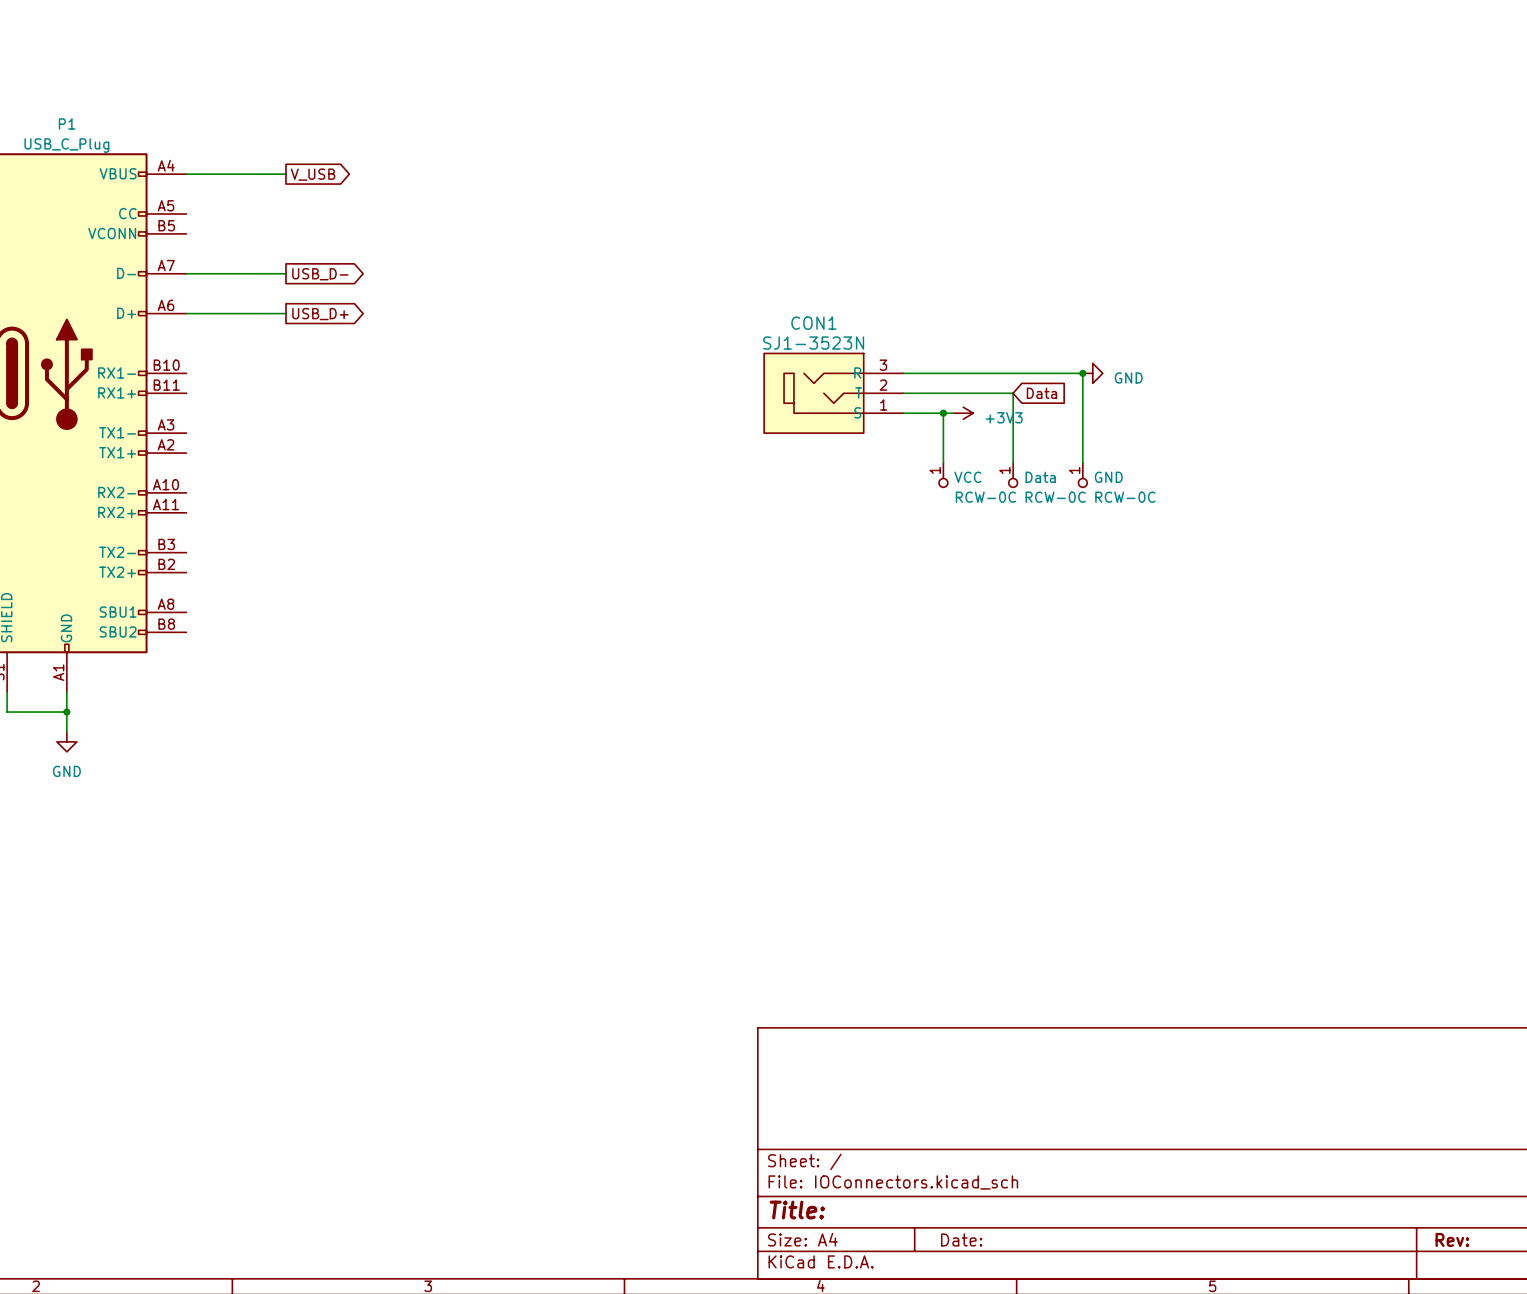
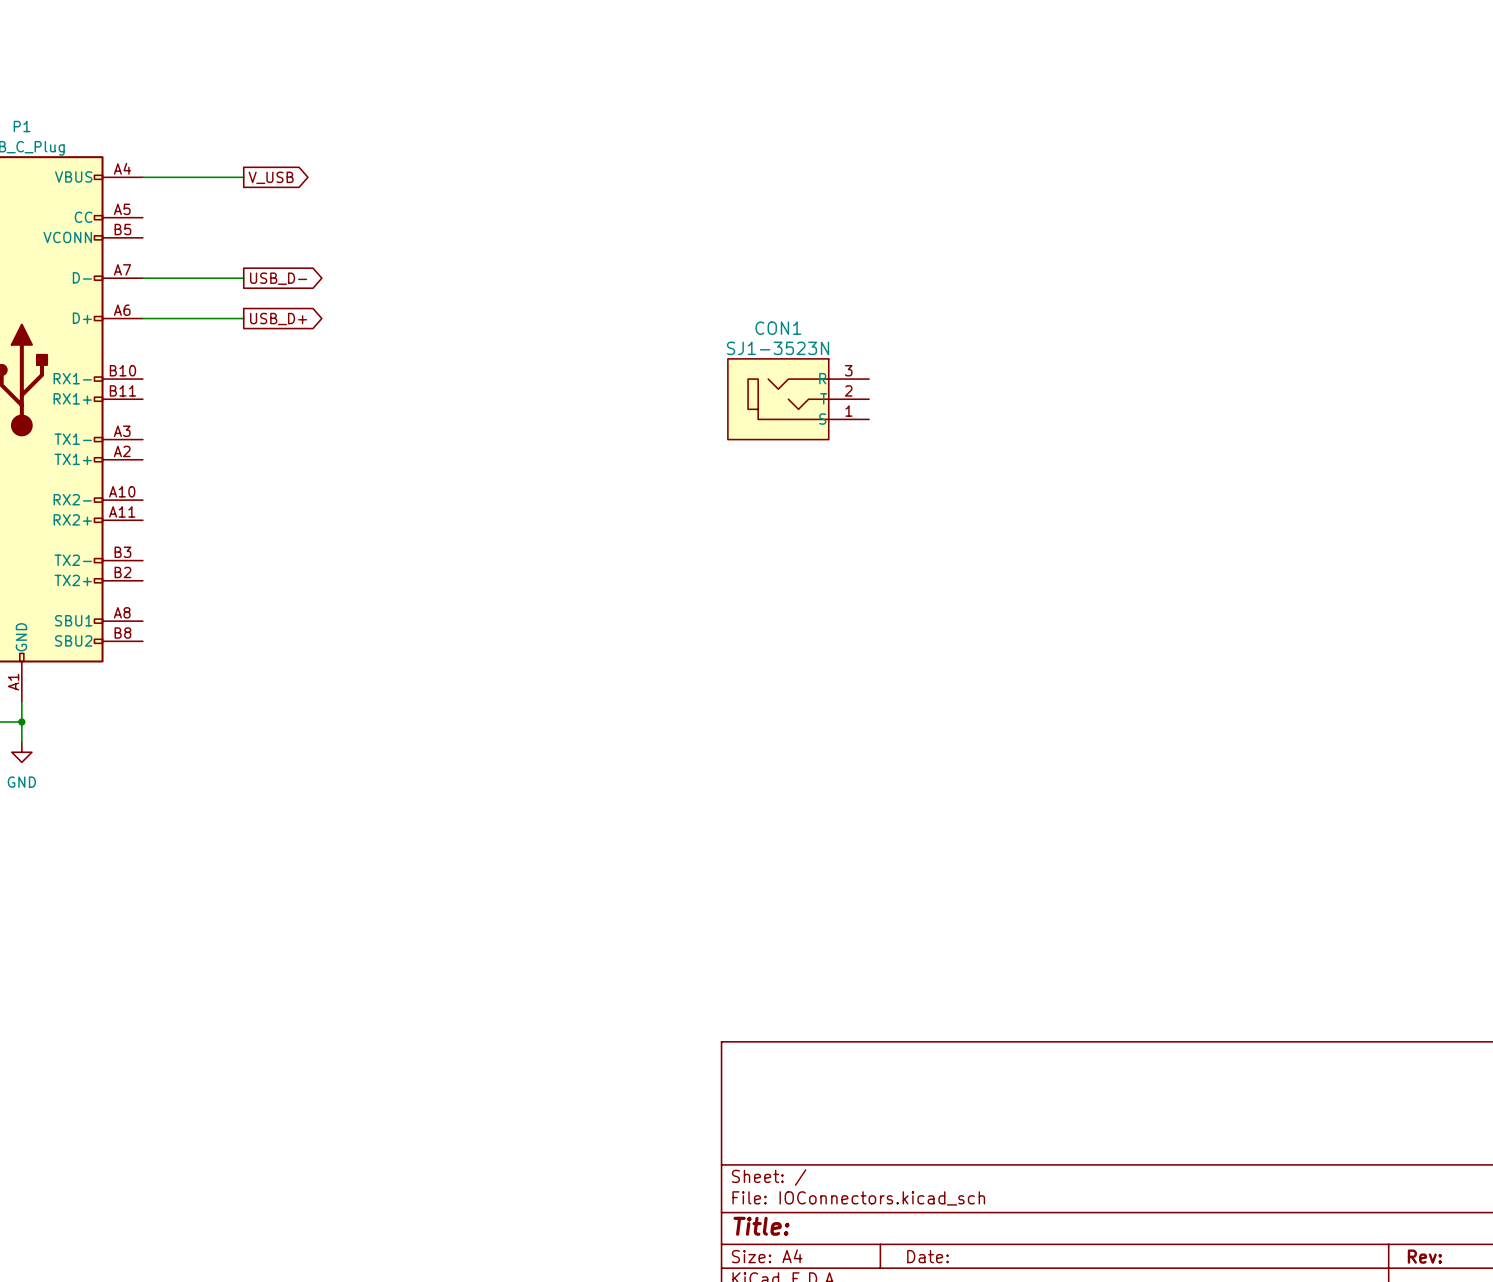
wire: (903, 373) (1082, 373) (1082, 463) -> none
junction: (1082, 373) -> none
power symbol: GND (1092, 373) -> none
wire: (903, 393) (1013, 393) (1013, 463) -> none
global label: Data (1041, 393) -> none
wire: (903, 413) (953, 413) -> none
wire: (943, 413) (943, 463) -> none
junction: (943, 413) -> none
power symbol: +3V3 (963, 413) -> none
VCC: RCW-0C (943, 475) -> none
Data: RCW-0C (1013, 475) -> none
GND: RCW-0C (1082, 475) -> none

